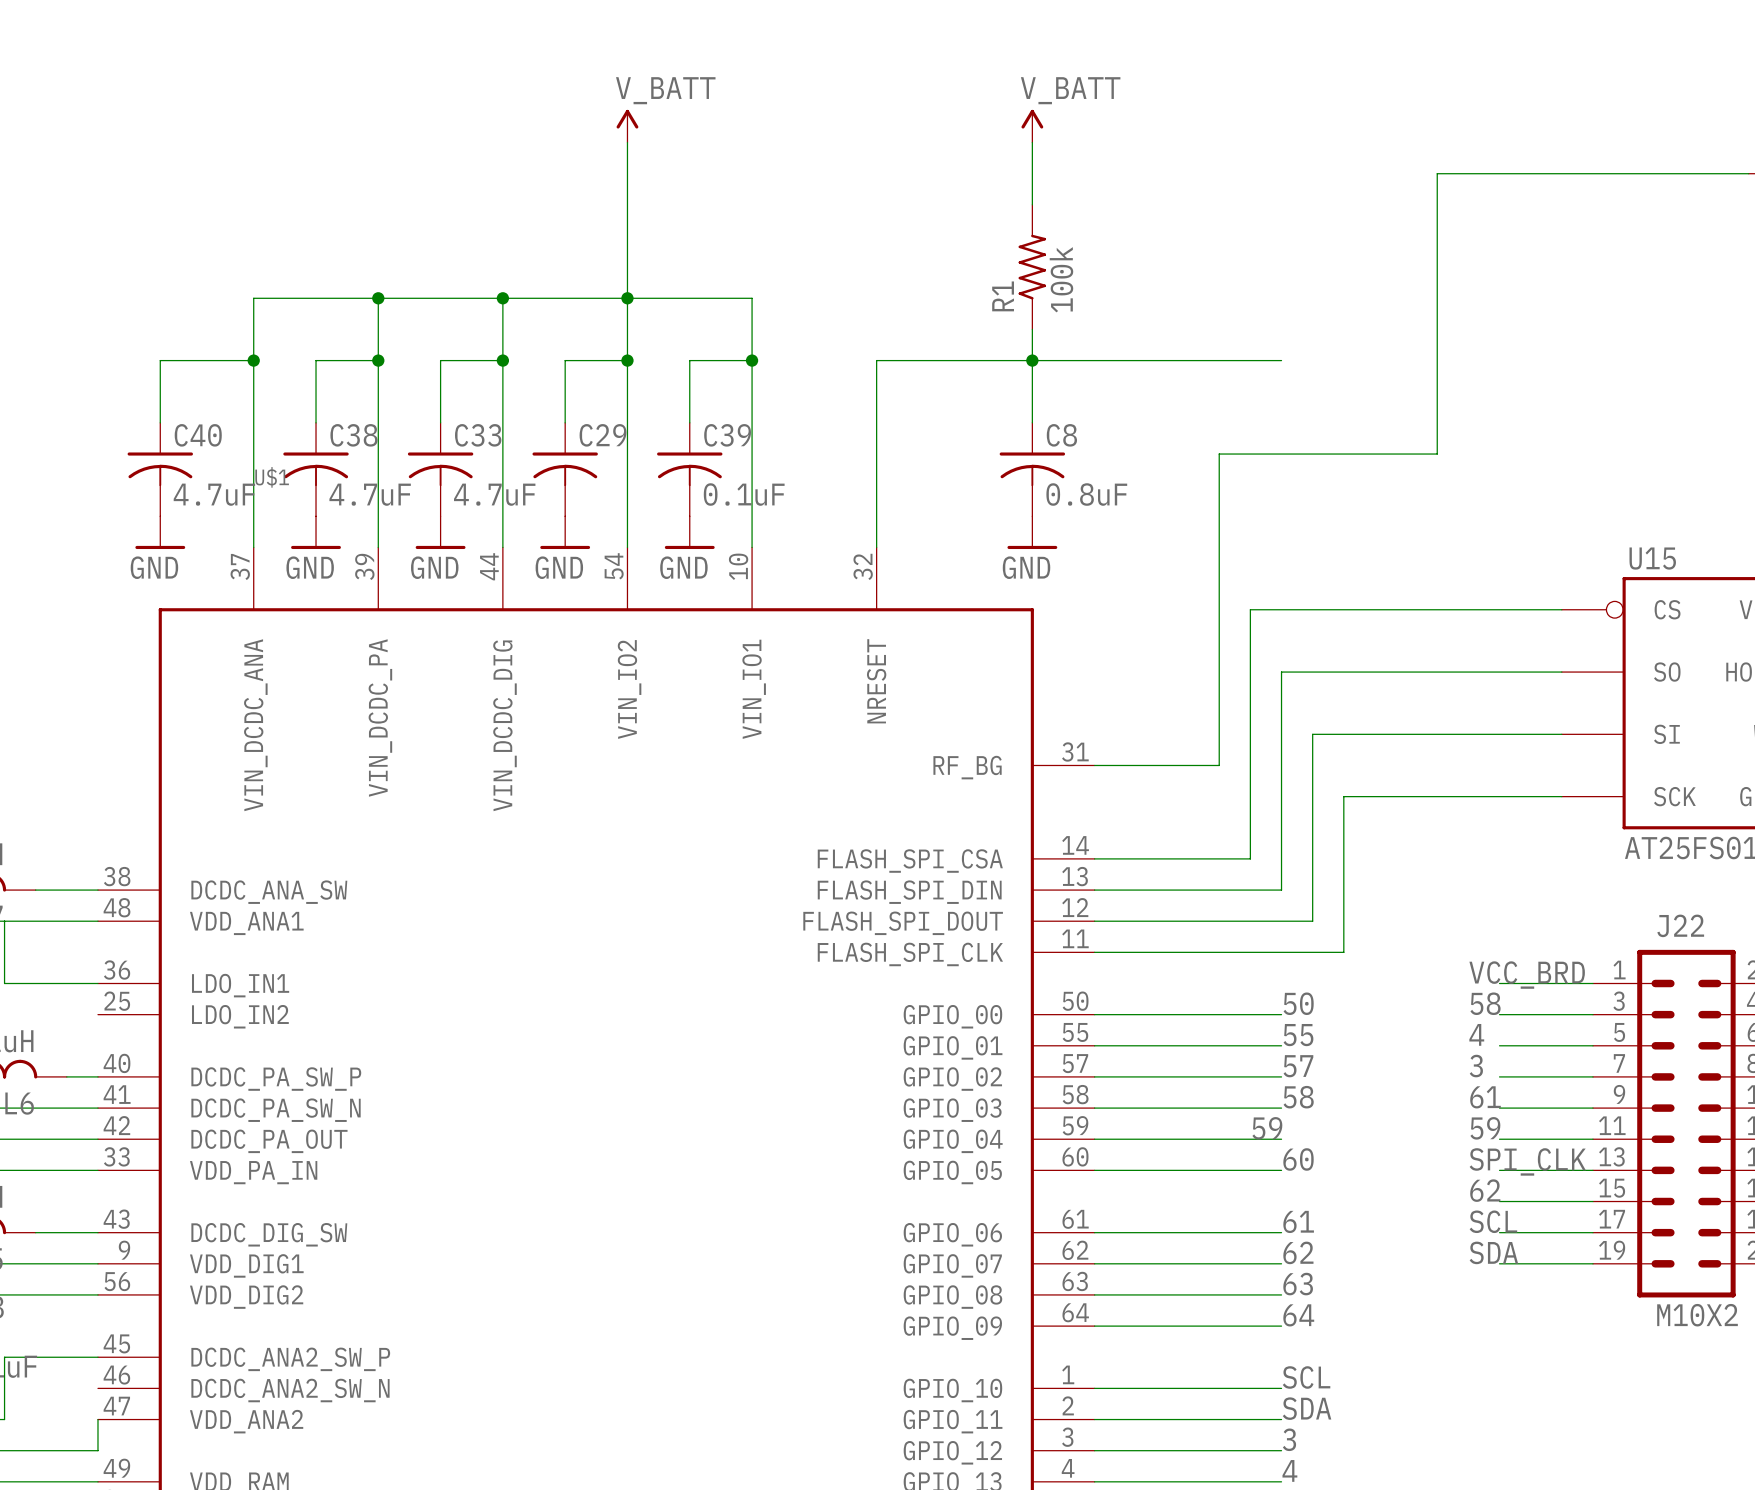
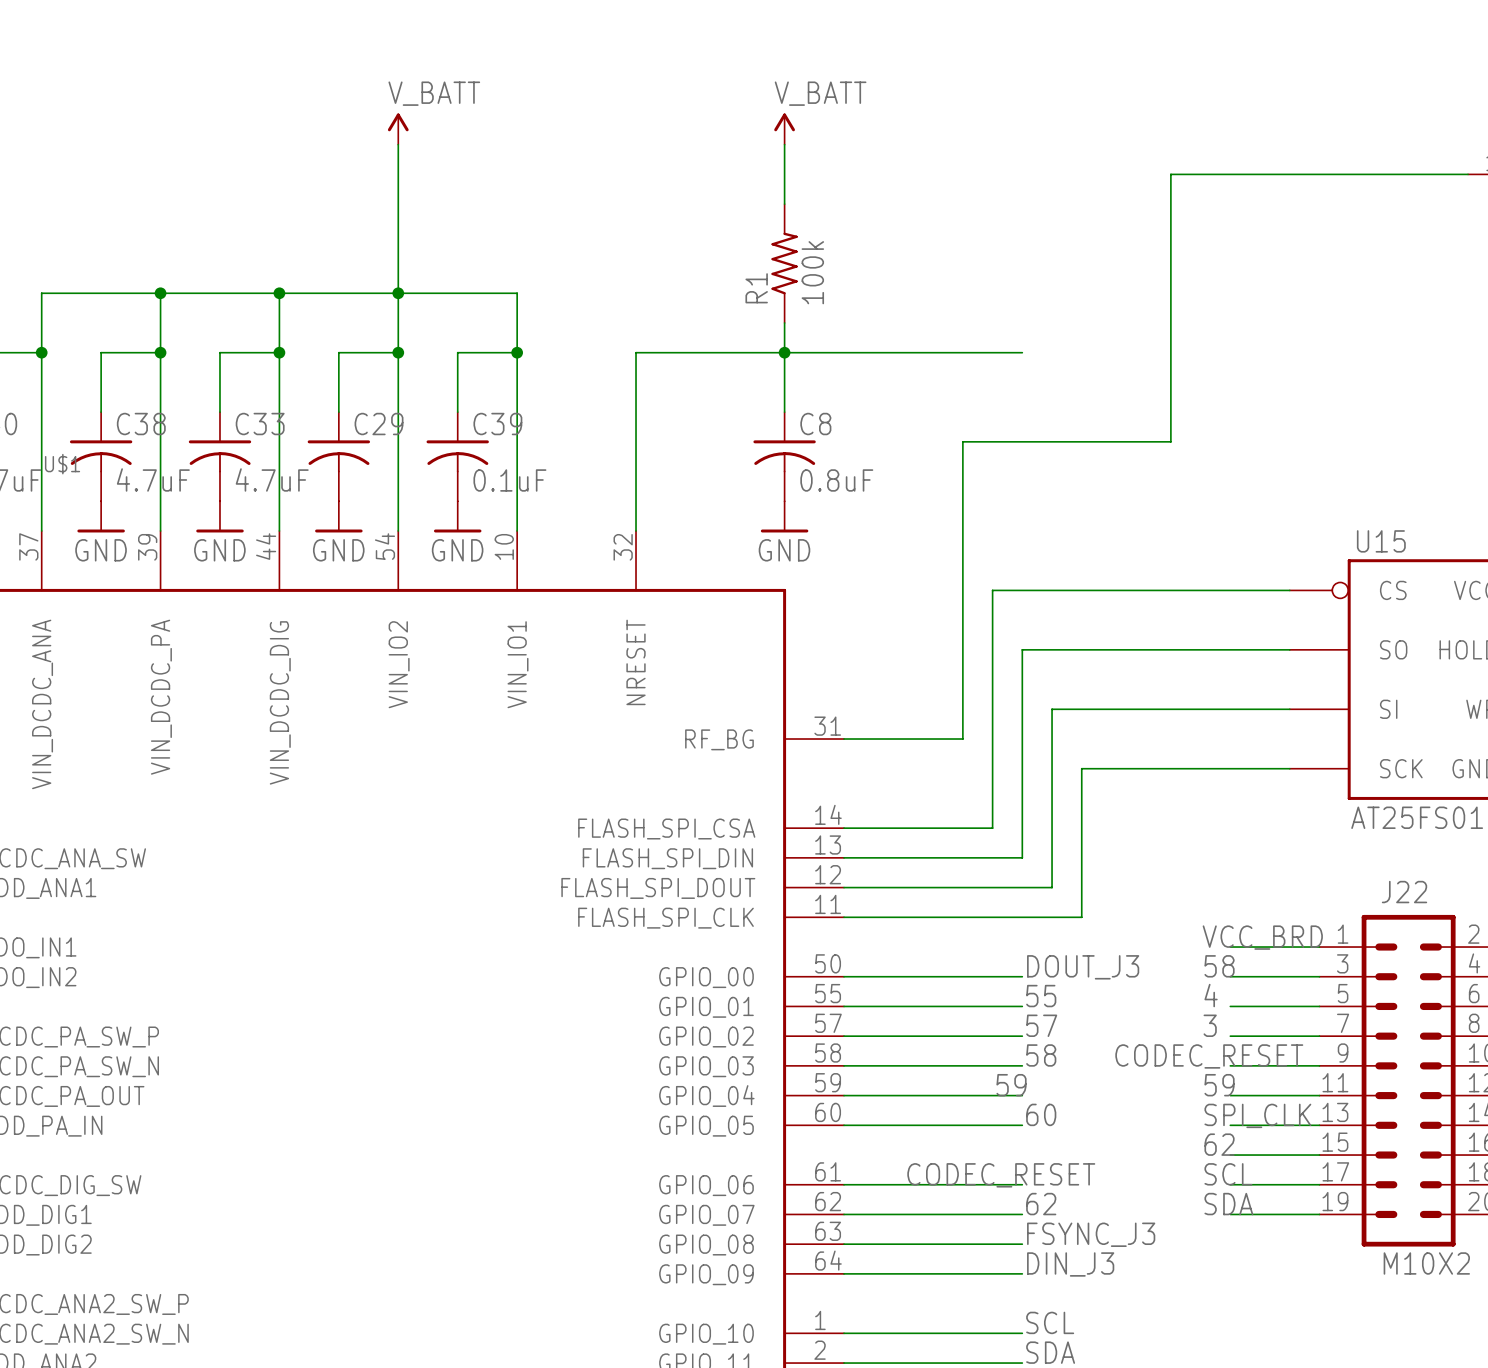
label: 50 (1298, 1003) -> DOUT_J3 (1083, 967)
label: 61 (1485, 1097) -> none
label: none -> CODEC_RESET (1209, 1056)
label: 61 (1298, 1221) -> none
label: none -> CODEC_RESET (1001, 1175)
label: 63 (1298, 1284) -> FSYNC_J3 (1091, 1234)
label: 64 (1298, 1315) -> DIN_J3 (1070, 1264)

